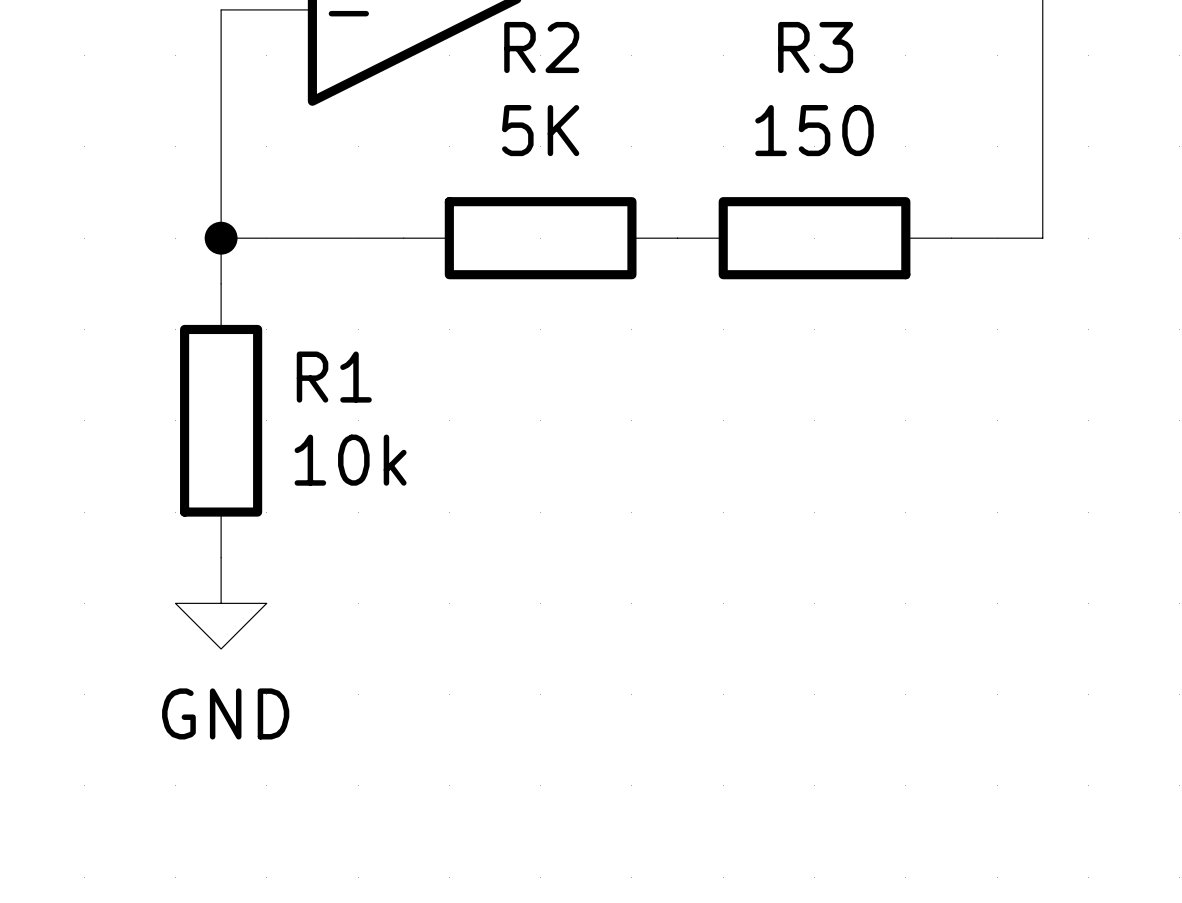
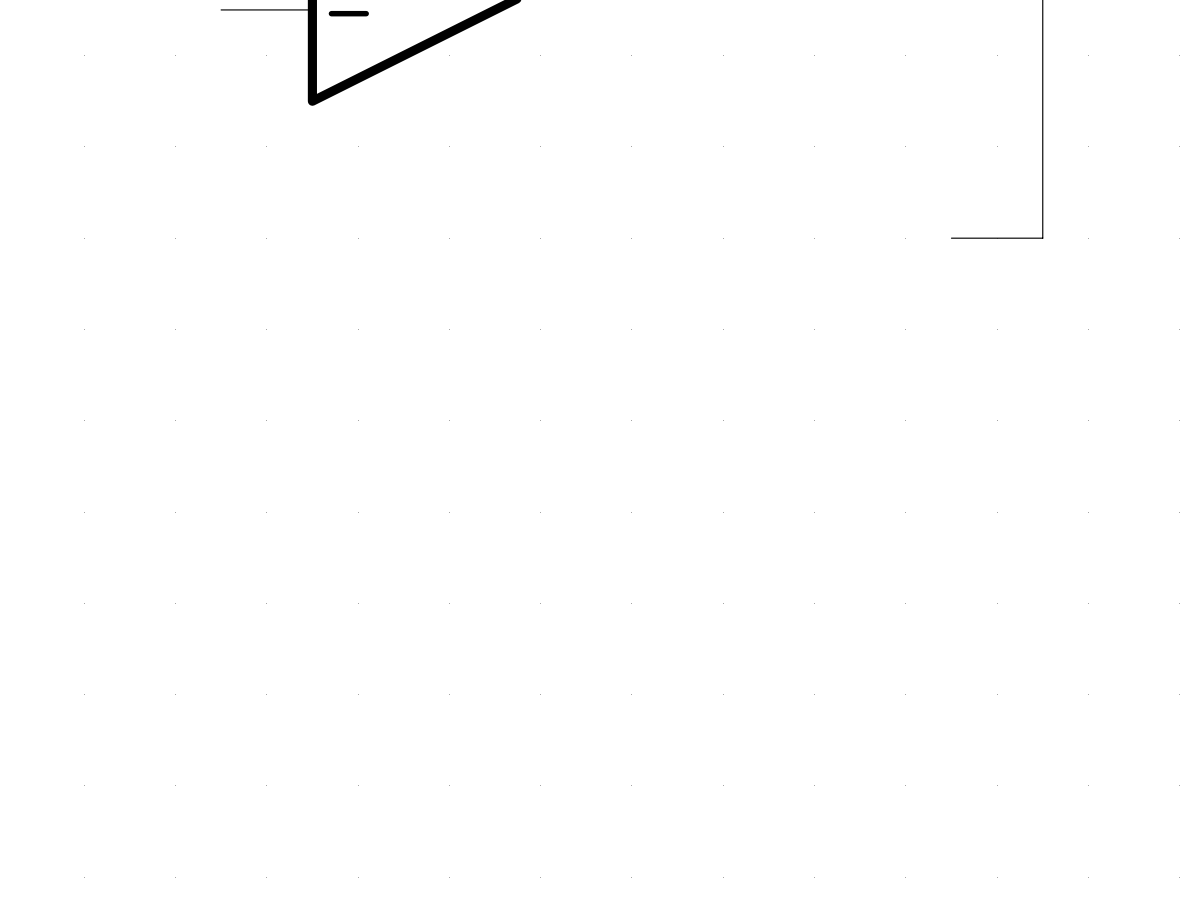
wire: (221, 9) (221, 283) -> none
wire: (221, 238) (403, 238) -> none
junction: (221, 238) -> none
R2: 5K (540, 238) -> none
R3: 150 (814, 238) -> none
R1: 10k (221, 420) -> none
power symbol: GND (221, 603) -> none

